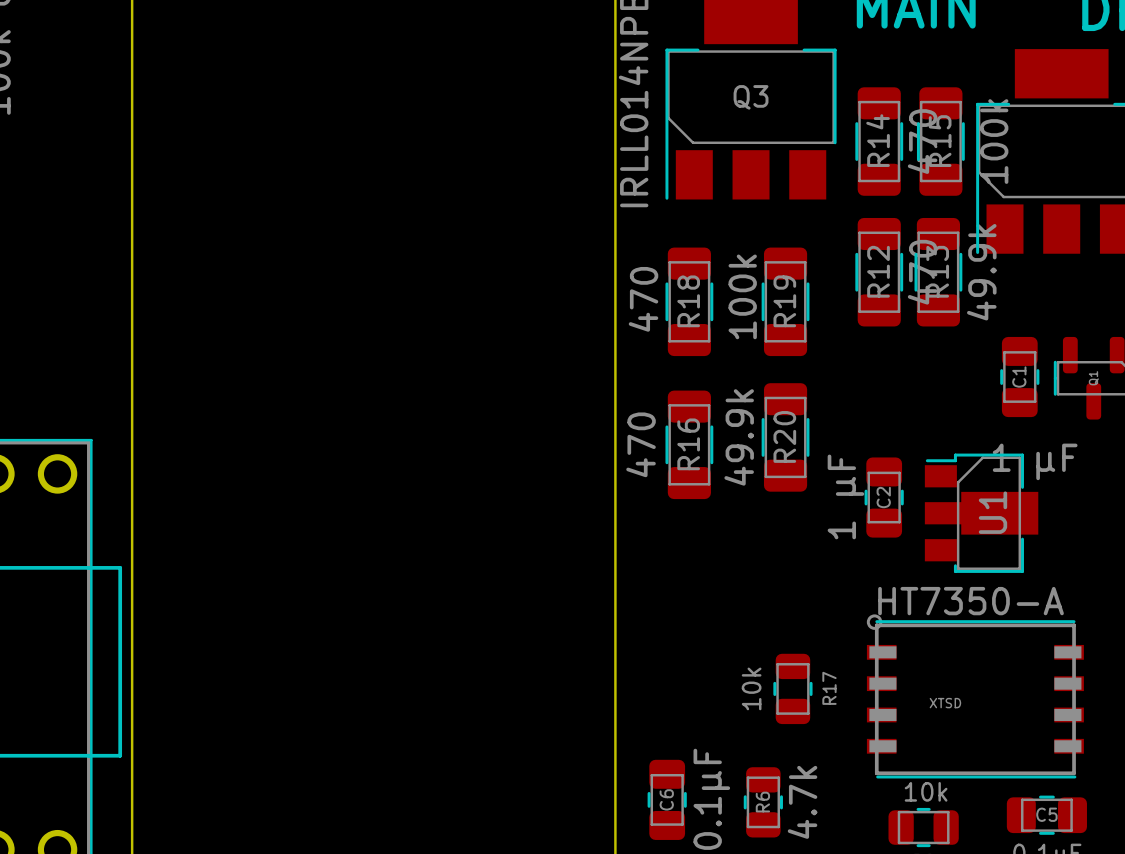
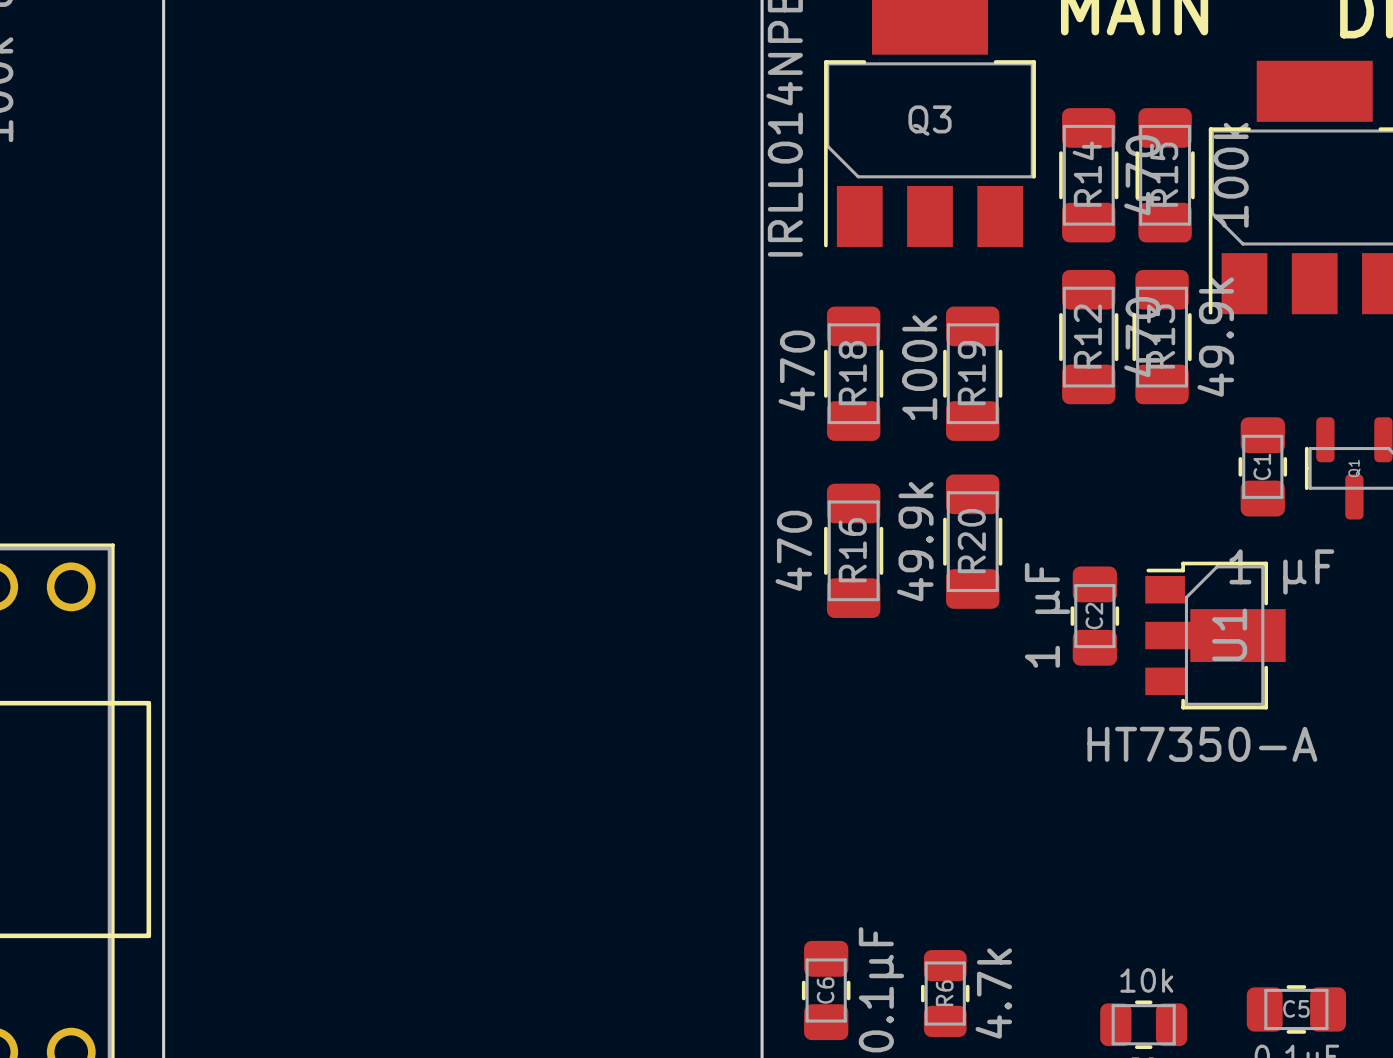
R17: 10k (792, 688) -> none
part: XTSD (975, 696) -> none

